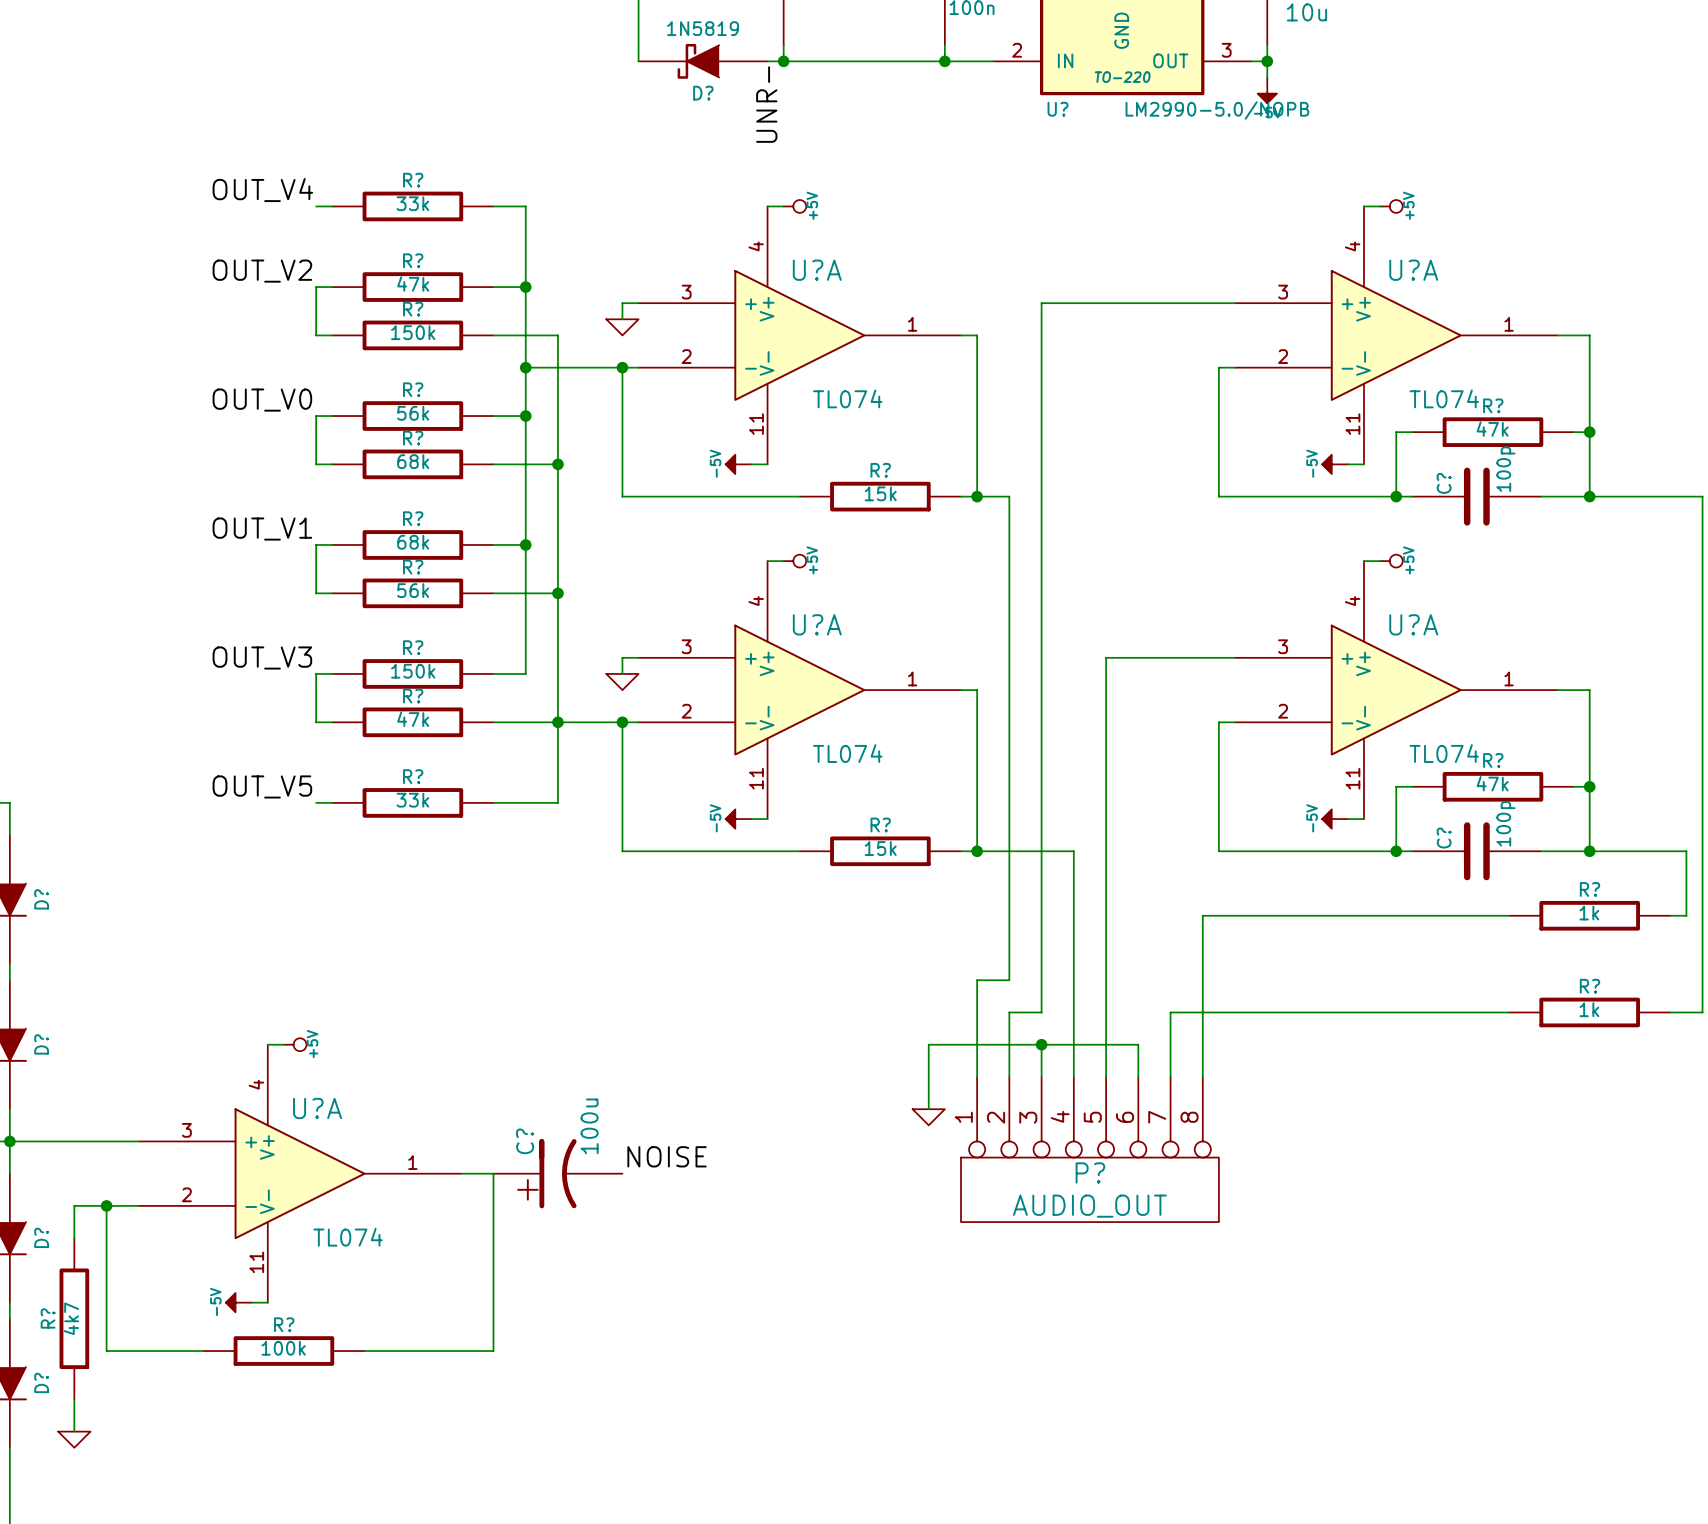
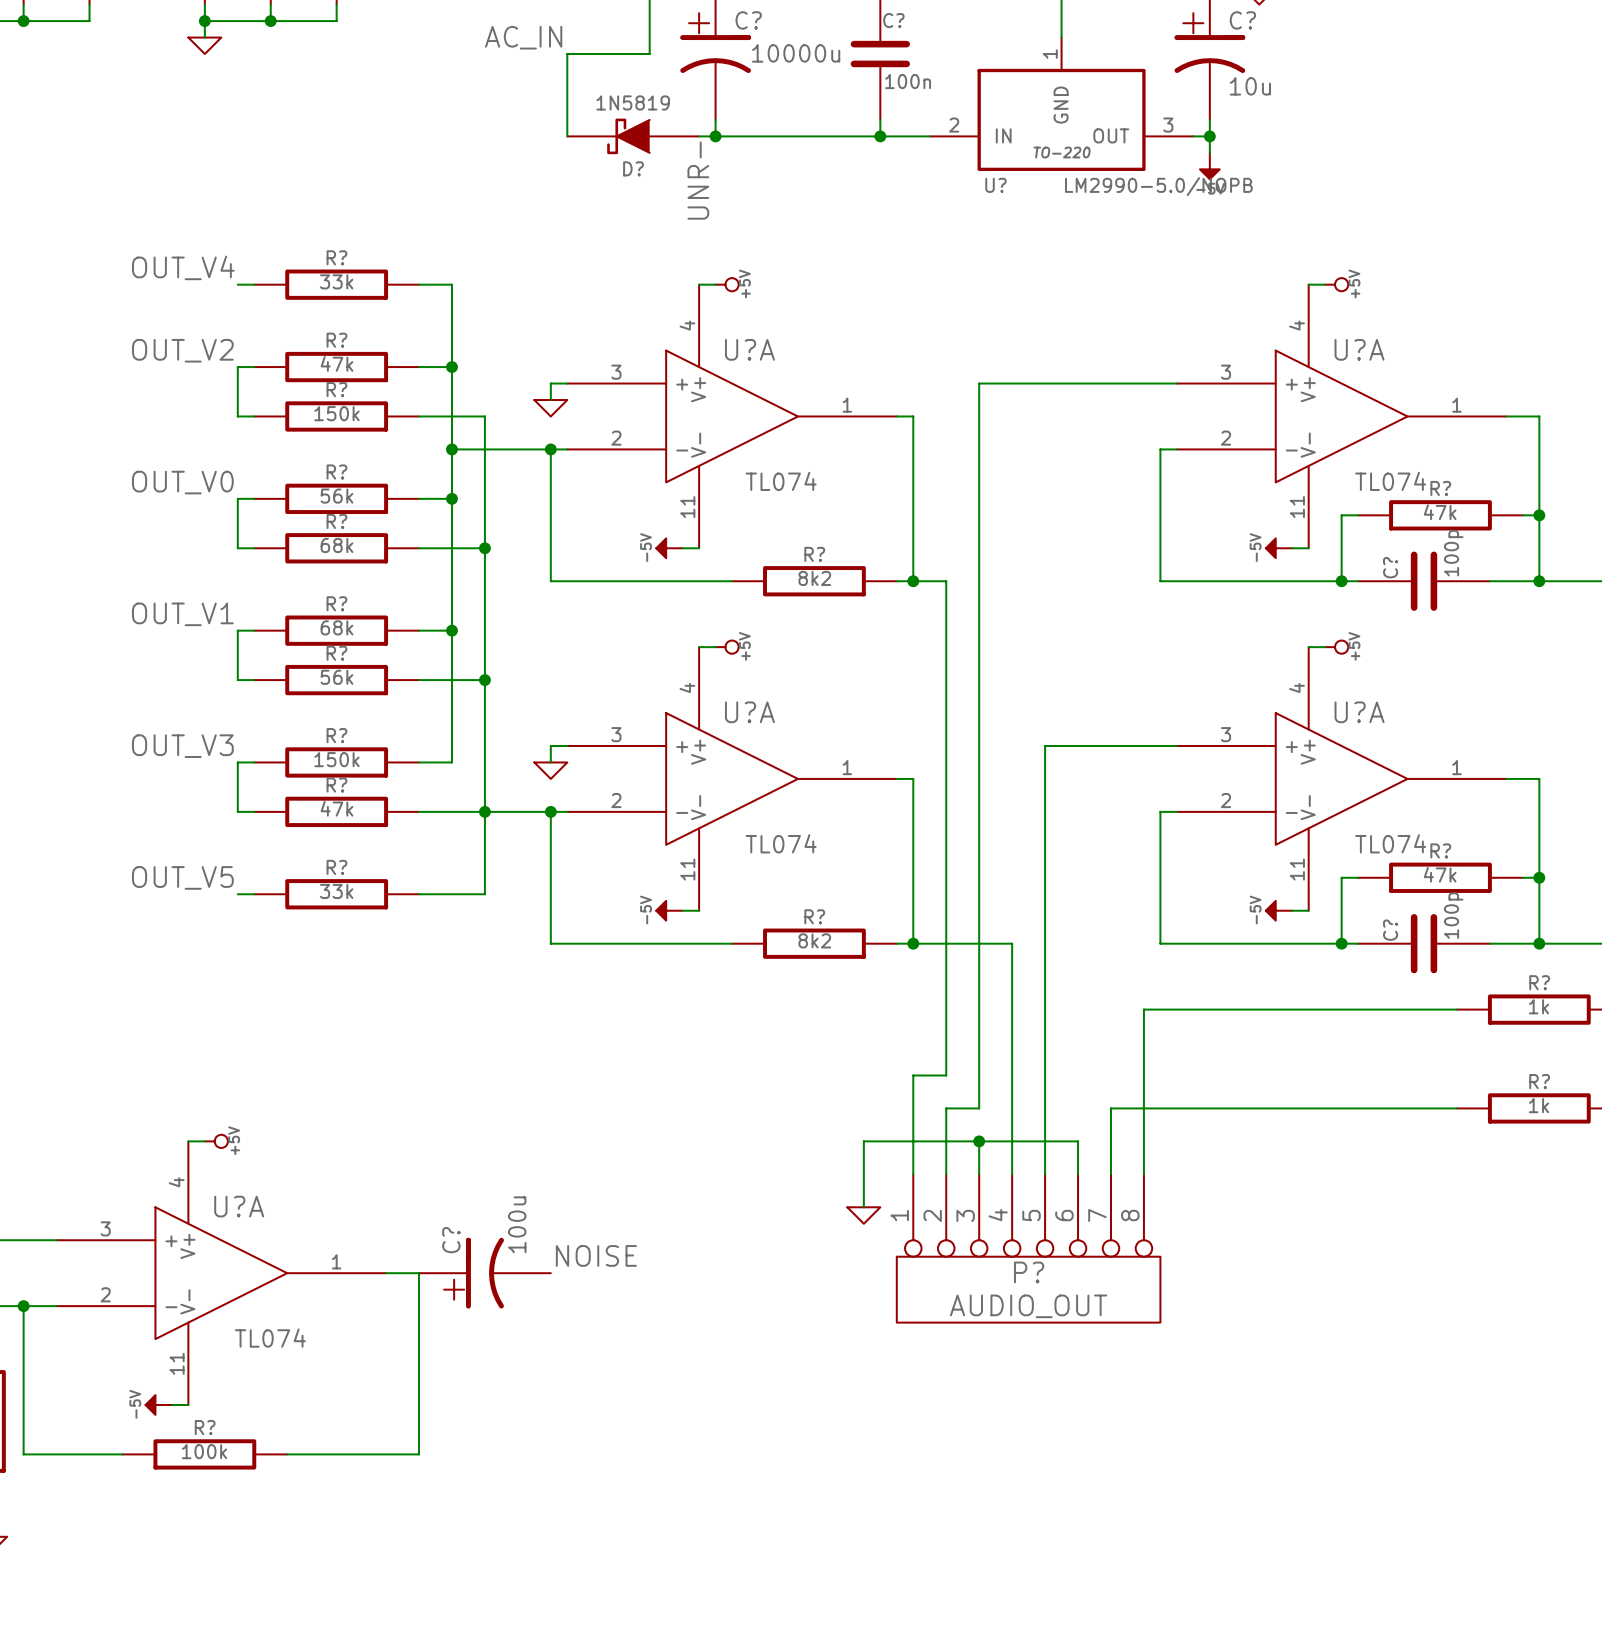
R? value: 15k (880, 493) -> 8k2 (814, 578)
R? value: 15k (880, 848) -> 8k2 (814, 940)

